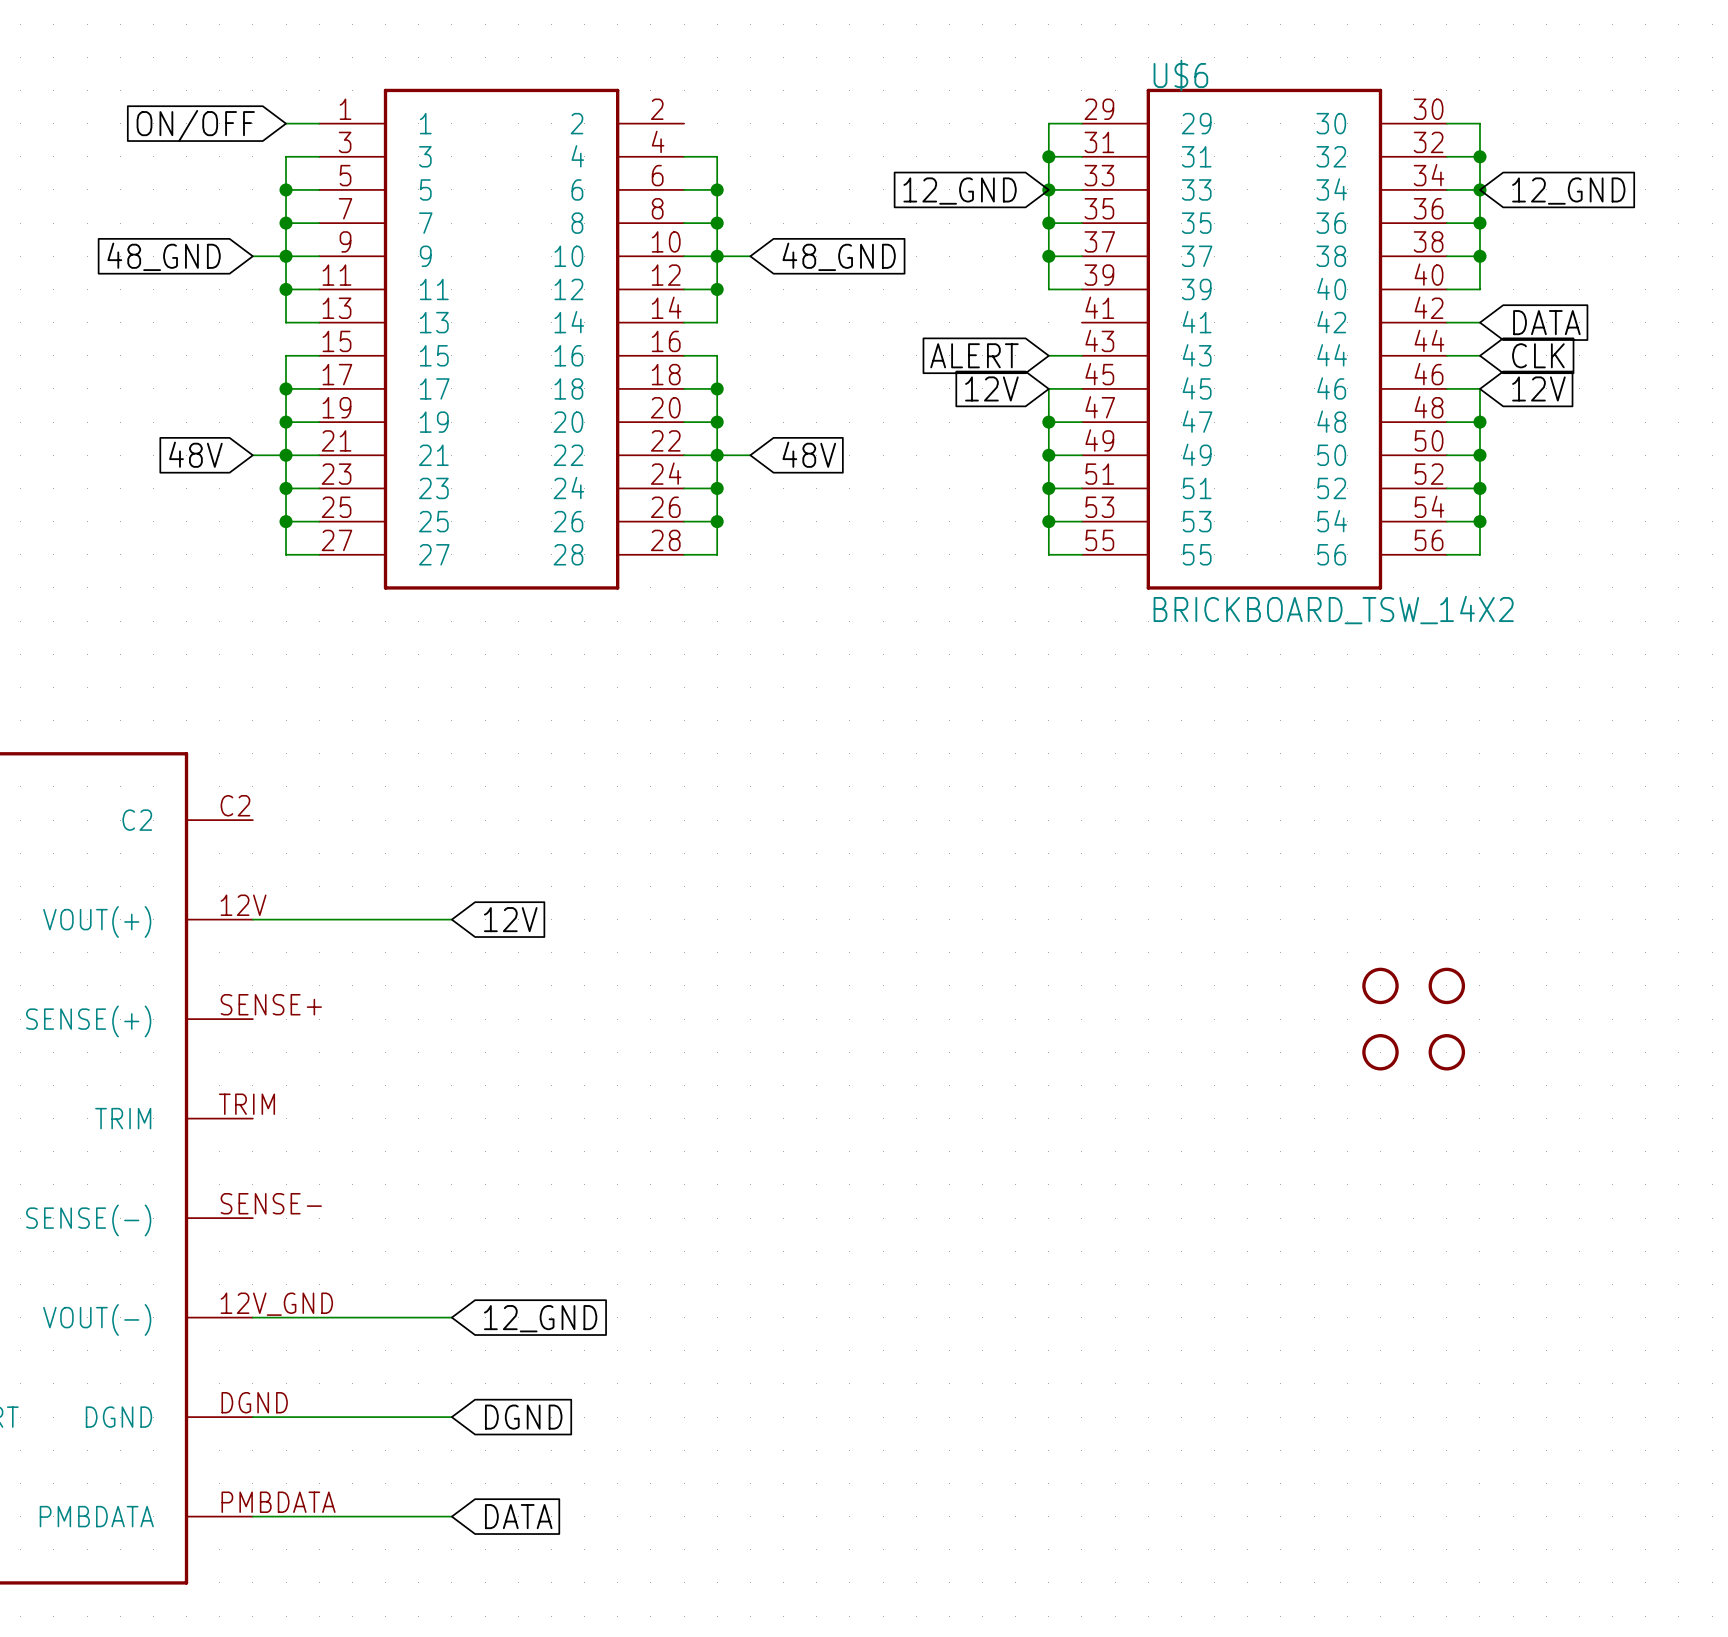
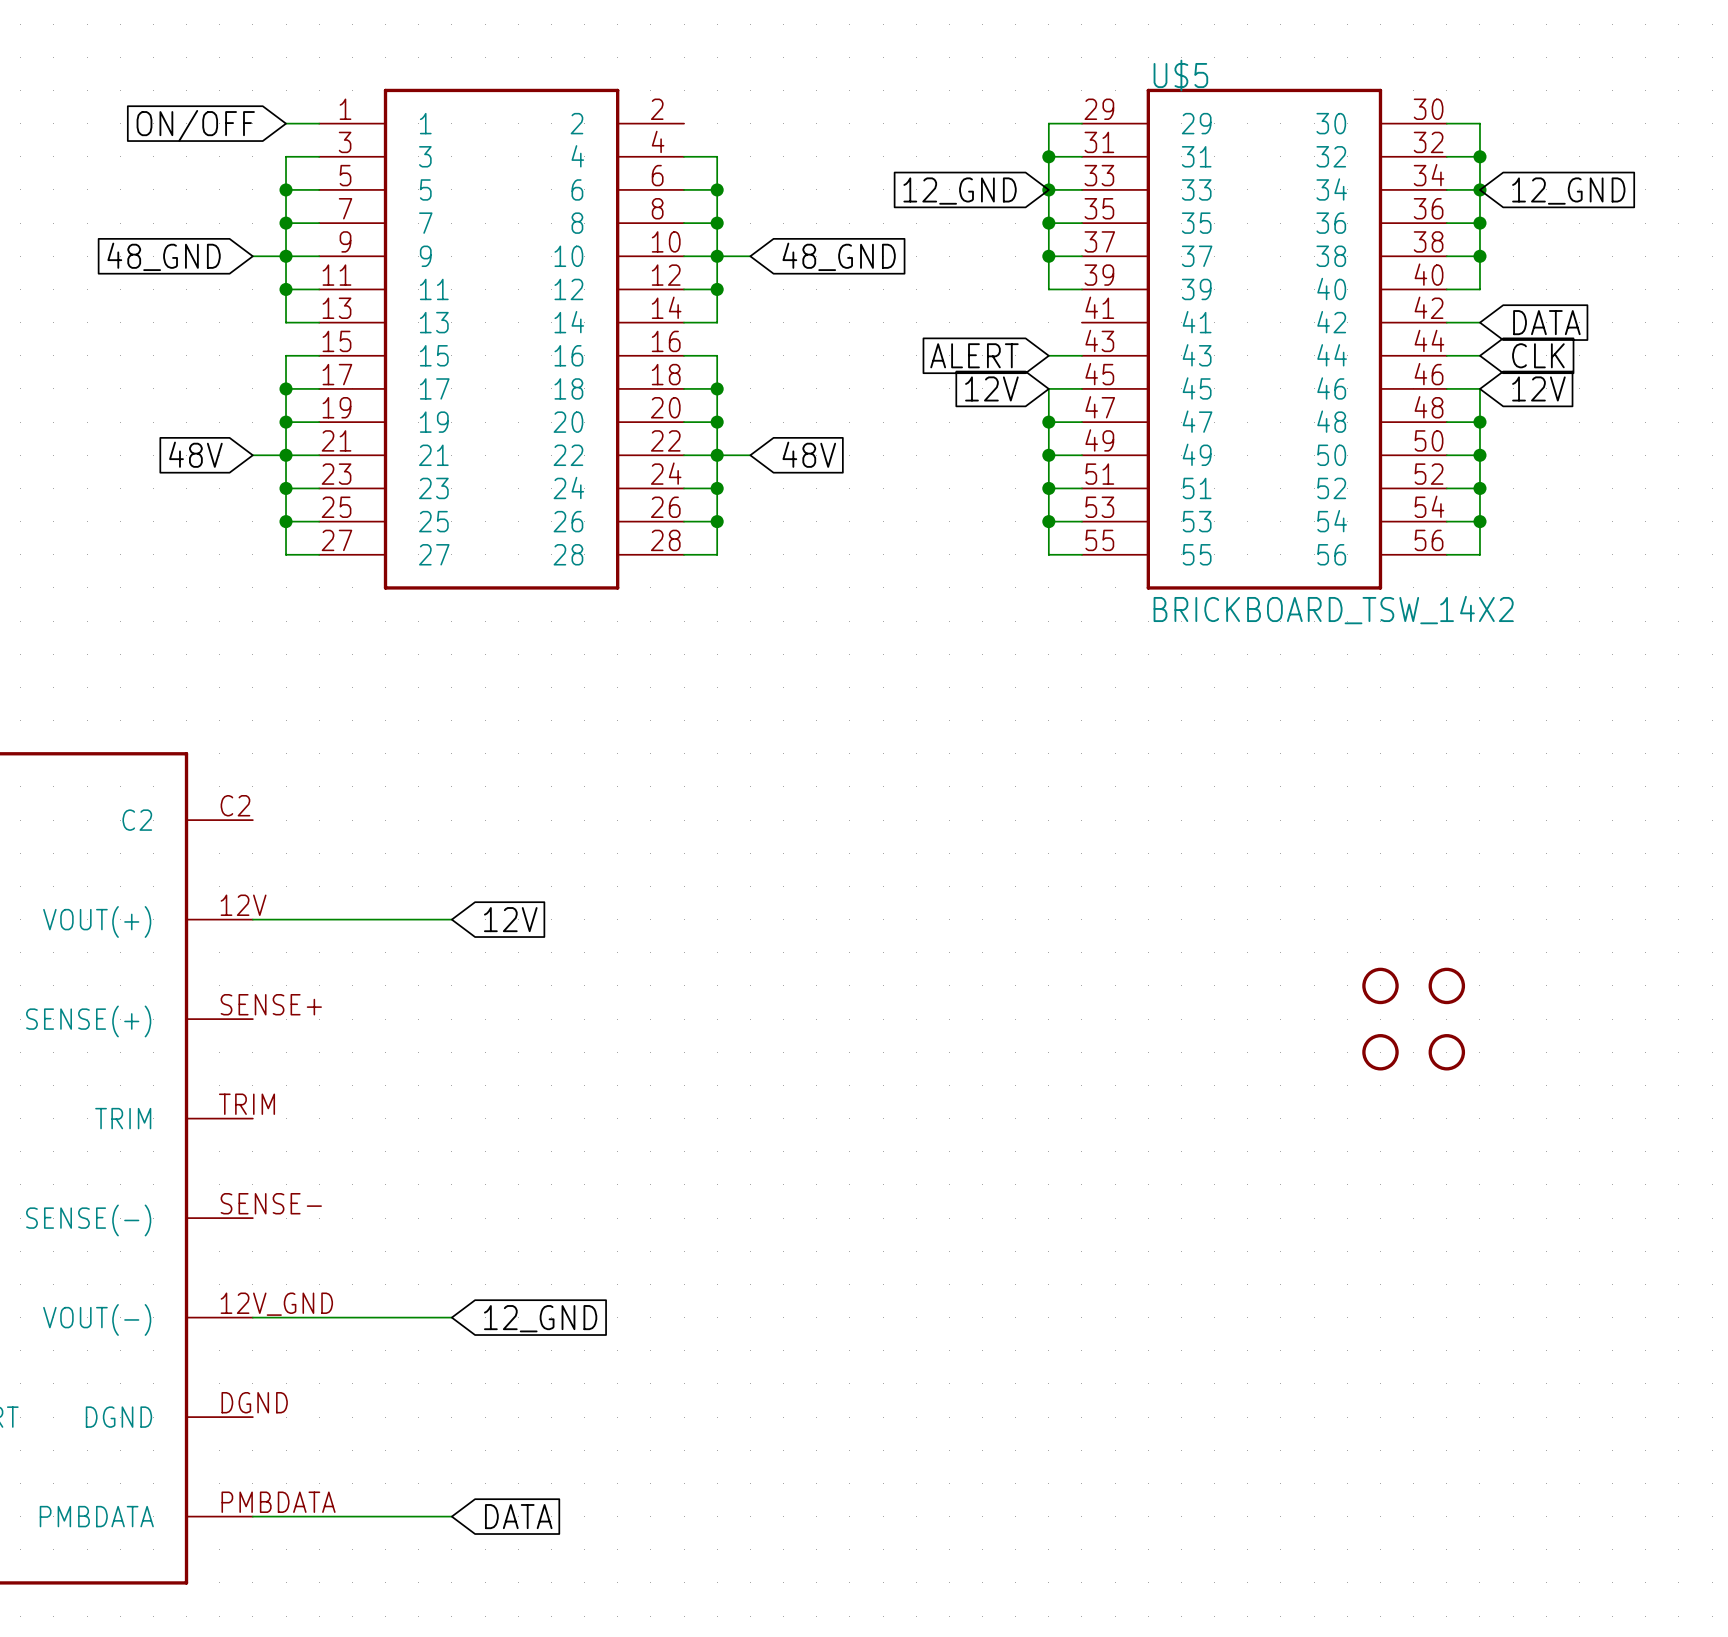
U$6 name: U$6 (1180, 75) -> U$5 (1180, 75)
wire: (252, 1417) (451, 1417) -> none
global label: DGND (523, 1417) -> none

